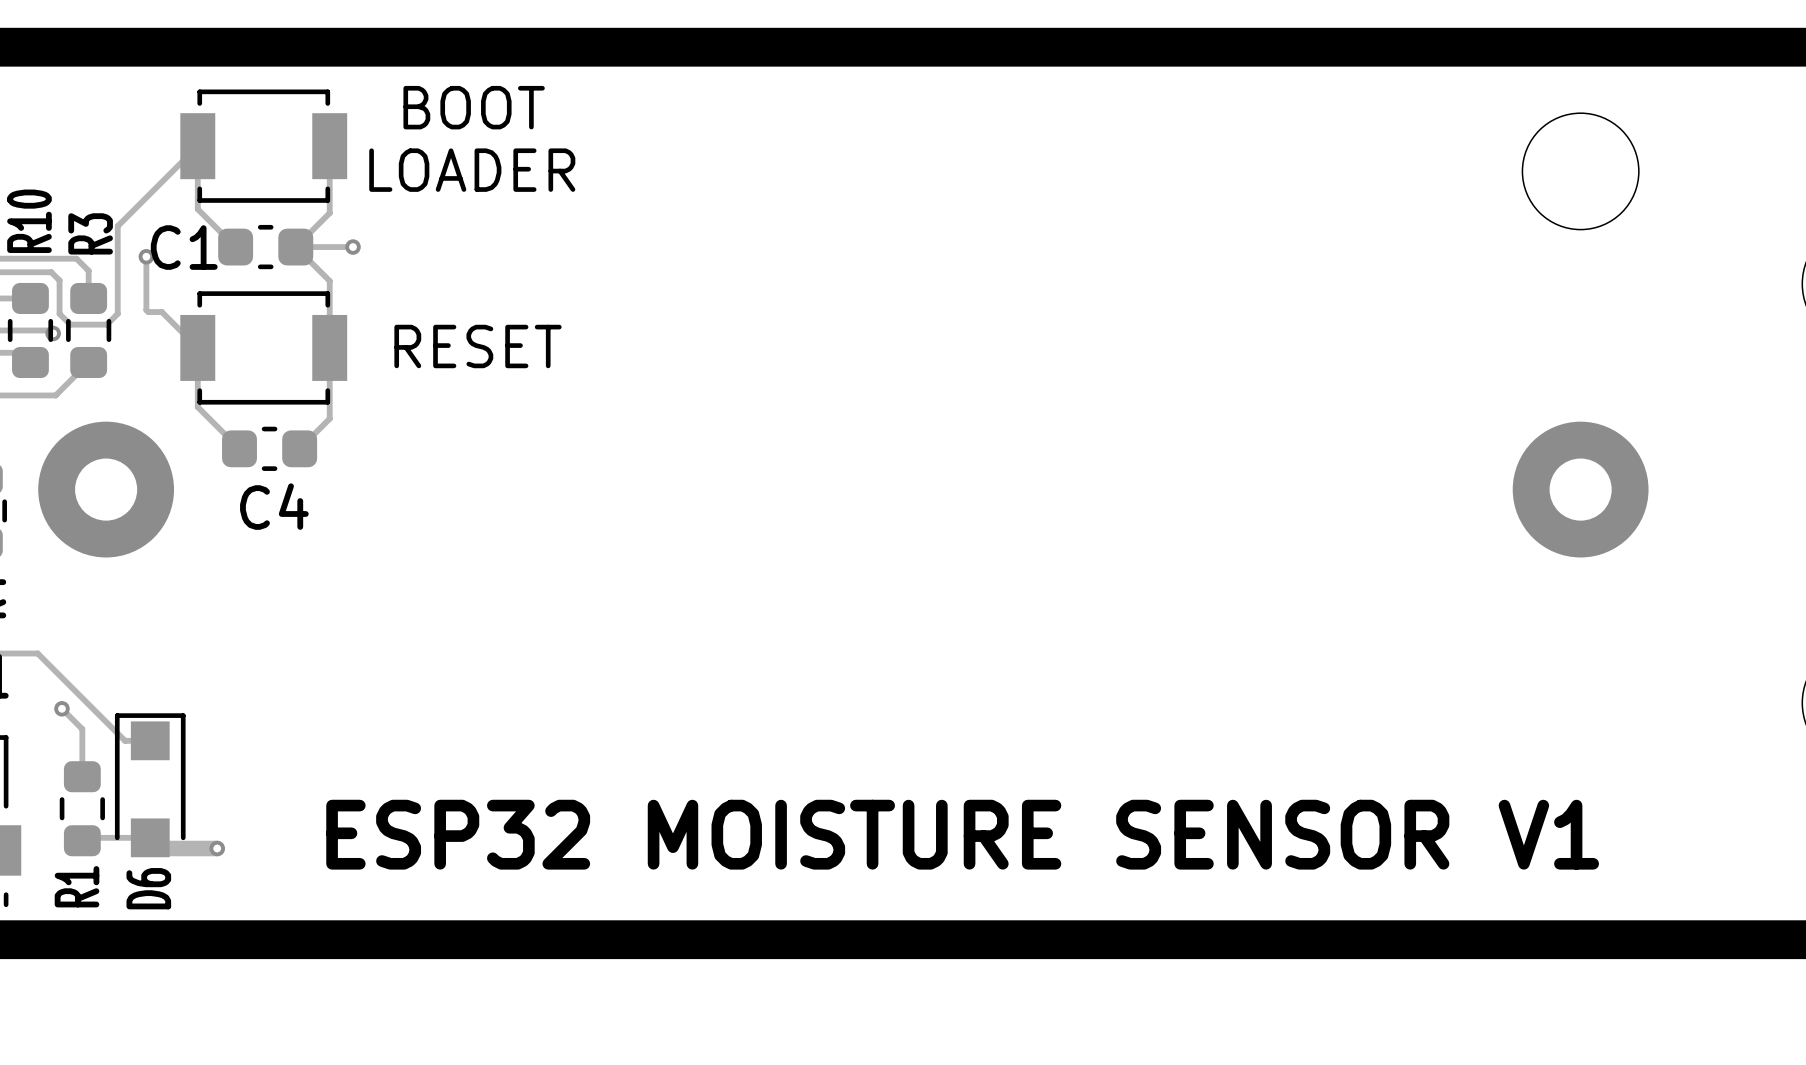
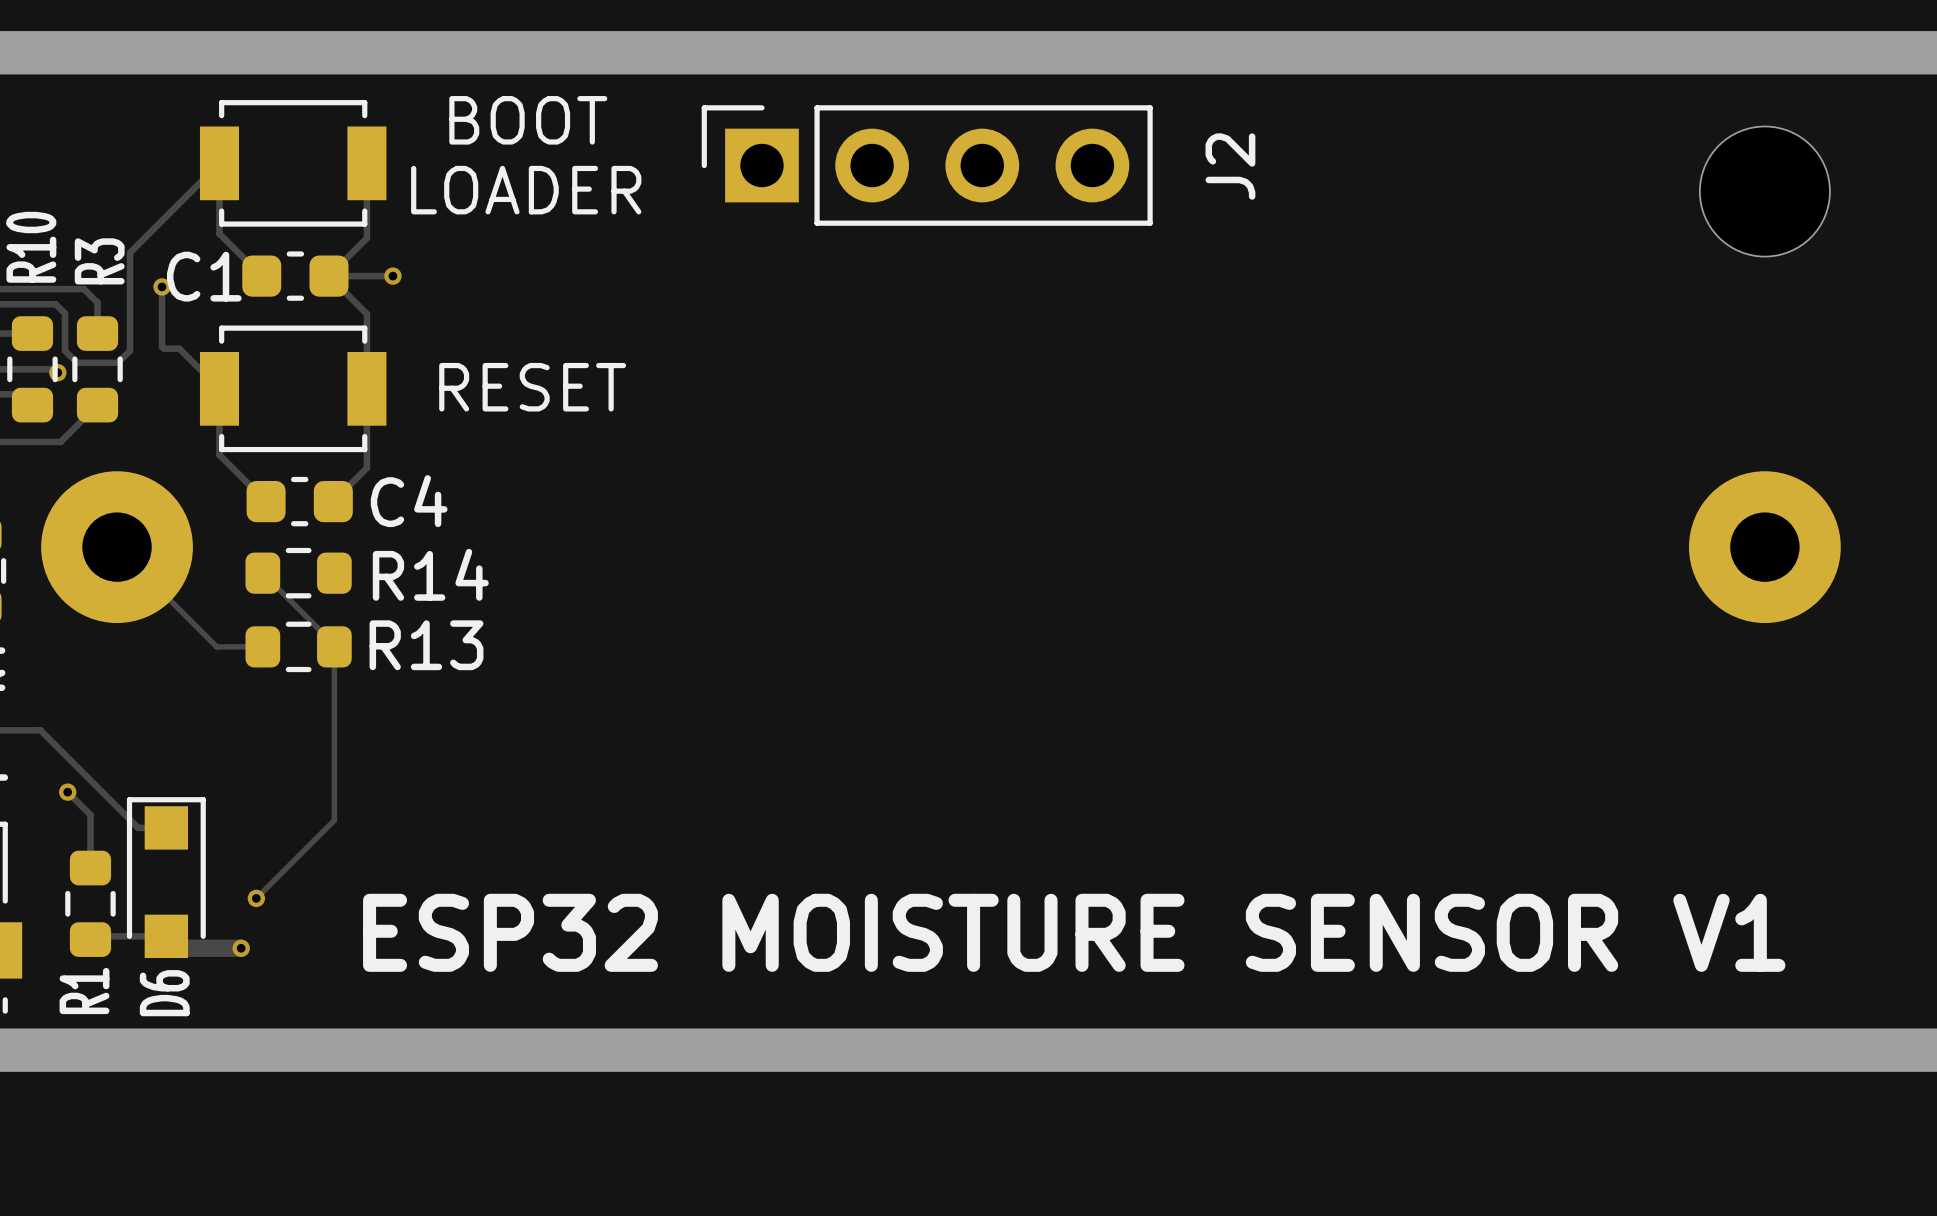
J2: none -> (927, 165)
track: none -> (117, 547) (216, 646) (262, 646)
C4 name position: C4 (274, 506) -> C4 (409, 501)
track: none -> (262, 573) (334, 644) (334, 820) (256, 898)
R14: none -> (298, 573)
R13: none -> (298, 646)
via: none -> (256, 898)

